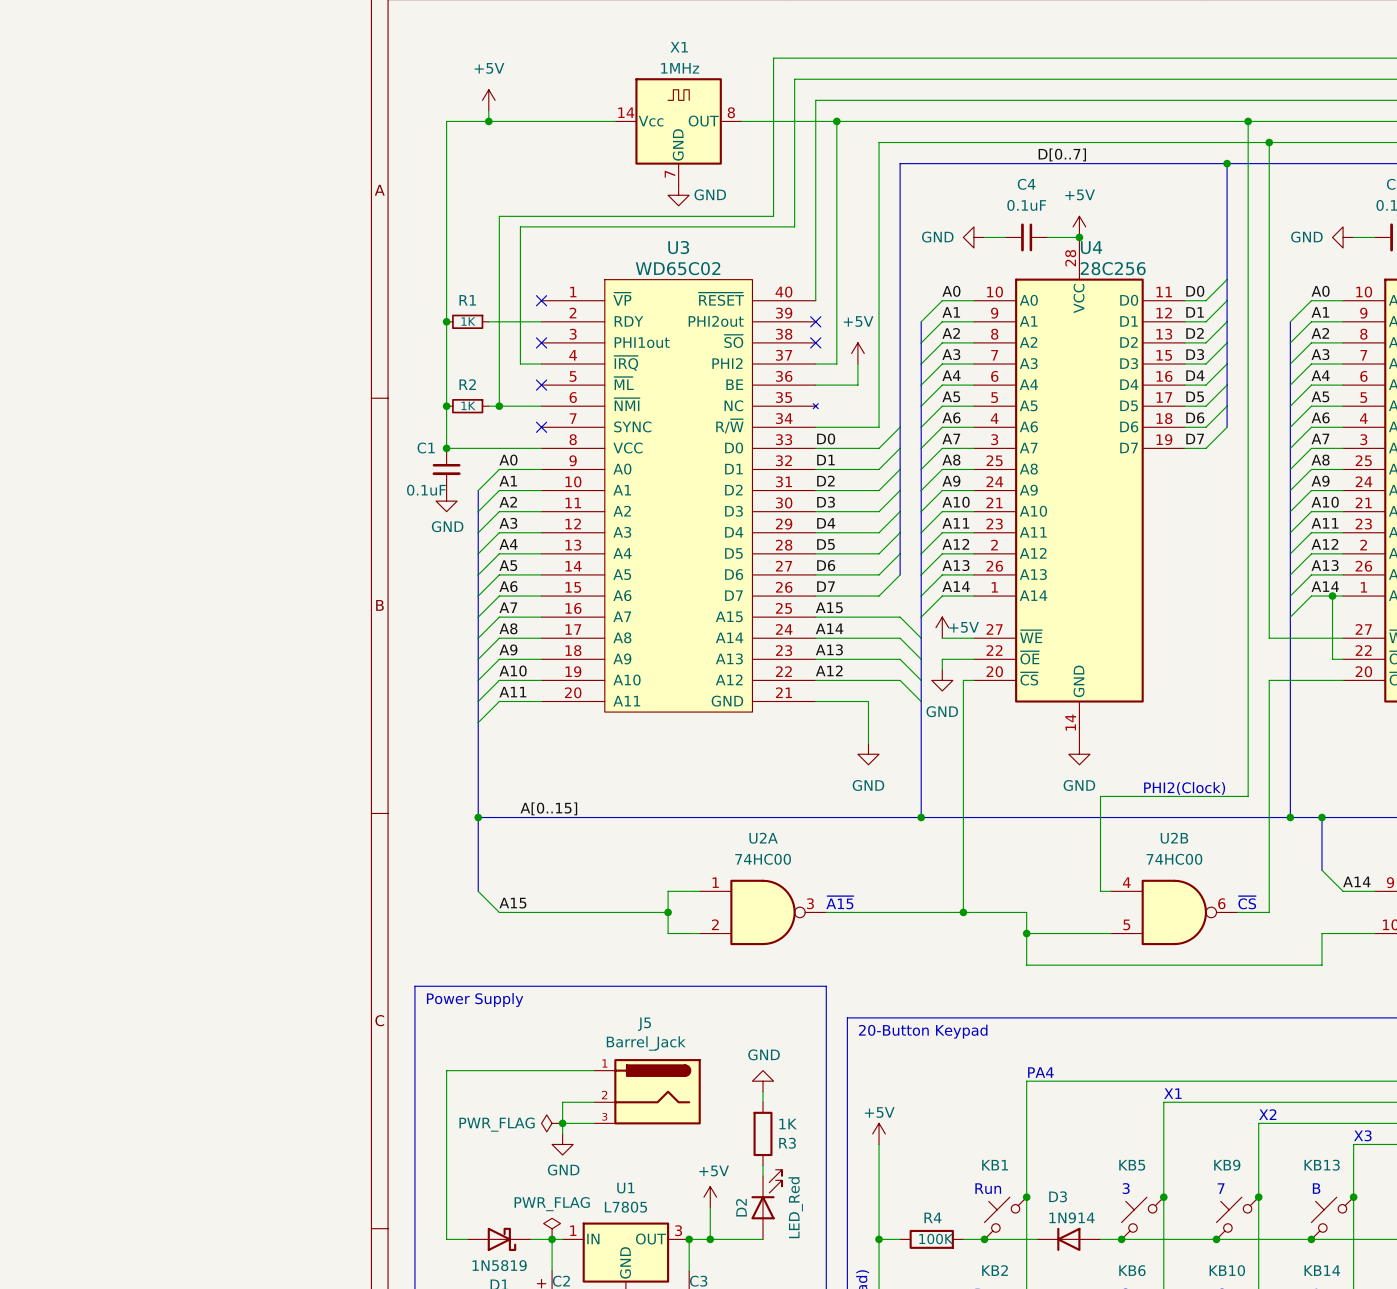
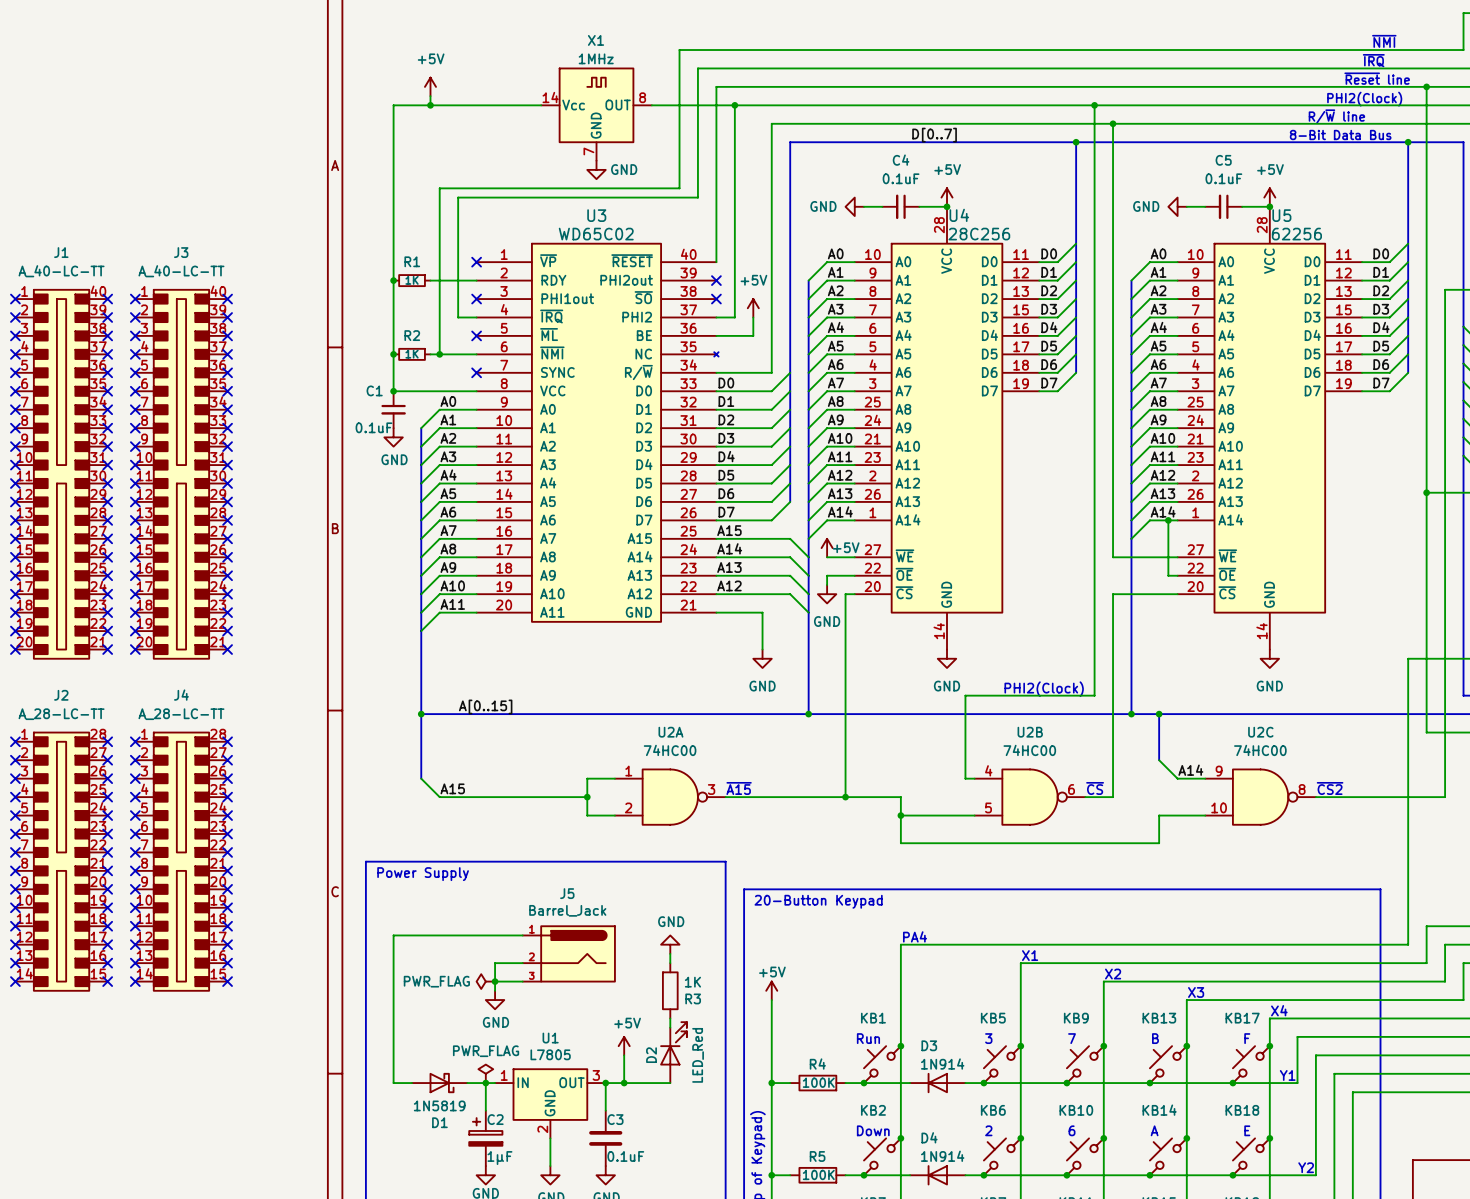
no-connect mark: none -> (15, 299)
no-connect mark: none -> (107, 299)
no-connect mark: none -> (135, 299)
no-connect mark: none -> (227, 299)
no-connect mark: none -> (15, 317)
no-connect mark: none -> (107, 317)
no-connect mark: none -> (135, 317)
no-connect mark: none -> (227, 317)
no-connect mark: none -> (15, 335)
no-connect mark: none -> (107, 335)
no-connect mark: none -> (135, 335)
no-connect mark: none -> (227, 335)
no-connect mark: none -> (15, 354)
no-connect mark: none -> (107, 354)
no-connect mark: none -> (135, 354)
no-connect mark: none -> (227, 354)
no-connect mark: none -> (15, 372)
no-connect mark: none -> (107, 372)
no-connect mark: none -> (135, 372)
no-connect mark: none -> (227, 372)
no-connect mark: none -> (15, 391)
no-connect mark: none -> (107, 391)
no-connect mark: none -> (135, 391)
no-connect mark: none -> (227, 391)
no-connect mark: none -> (15, 409)
no-connect mark: none -> (107, 409)
no-connect mark: none -> (135, 409)
no-connect mark: none -> (227, 409)
no-connect mark: none -> (15, 428)
no-connect mark: none -> (107, 428)
no-connect mark: none -> (135, 428)
no-connect mark: none -> (227, 428)
no-connect mark: none -> (15, 446)
no-connect mark: none -> (107, 446)
no-connect mark: none -> (135, 446)
no-connect mark: none -> (227, 446)
no-connect mark: none -> (15, 465)
no-connect mark: none -> (107, 465)
no-connect mark: none -> (135, 465)
no-connect mark: none -> (227, 465)
J1: none -> A_40-LC-TT (61, 474)
J3: none -> A_40-LC-TT (181, 474)
no-connect mark: none -> (15, 483)
no-connect mark: none -> (107, 483)
no-connect mark: none -> (135, 483)
no-connect mark: none -> (227, 483)
no-connect mark: none -> (15, 501)
no-connect mark: none -> (107, 501)
no-connect mark: none -> (135, 501)
no-connect mark: none -> (227, 501)
no-connect mark: none -> (15, 520)
no-connect mark: none -> (107, 520)
no-connect mark: none -> (135, 520)
no-connect mark: none -> (227, 520)
no-connect mark: none -> (15, 538)
no-connect mark: none -> (107, 538)
no-connect mark: none -> (135, 538)
no-connect mark: none -> (227, 538)
no-connect mark: none -> (15, 557)
no-connect mark: none -> (107, 557)
no-connect mark: none -> (135, 557)
no-connect mark: none -> (227, 557)
no-connect mark: none -> (15, 575)
no-connect mark: none -> (107, 575)
no-connect mark: none -> (135, 575)
no-connect mark: none -> (227, 575)
no-connect mark: none -> (15, 594)
no-connect mark: none -> (107, 594)
no-connect mark: none -> (135, 594)
no-connect mark: none -> (227, 594)
no-connect mark: none -> (15, 612)
no-connect mark: none -> (107, 612)
no-connect mark: none -> (135, 612)
no-connect mark: none -> (227, 612)
no-connect mark: none -> (15, 631)
no-connect mark: none -> (107, 631)
no-connect mark: none -> (135, 631)
no-connect mark: none -> (227, 631)
no-connect mark: none -> (15, 649)
no-connect mark: none -> (107, 649)
no-connect mark: none -> (135, 649)
no-connect mark: none -> (227, 649)
no-connect mark: none -> (15, 741)
no-connect mark: none -> (107, 741)
no-connect mark: none -> (135, 741)
no-connect mark: none -> (227, 741)
no-connect mark: none -> (15, 760)
no-connect mark: none -> (107, 760)
no-connect mark: none -> (135, 760)
no-connect mark: none -> (227, 760)
no-connect mark: none -> (15, 778)
no-connect mark: none -> (107, 778)
no-connect mark: none -> (135, 778)
no-connect mark: none -> (227, 778)
no-connect mark: none -> (15, 797)
no-connect mark: none -> (107, 797)
no-connect mark: none -> (135, 797)
no-connect mark: none -> (227, 797)
no-connect mark: none -> (15, 815)
no-connect mark: none -> (107, 815)
no-connect mark: none -> (135, 815)
no-connect mark: none -> (227, 815)
no-connect mark: none -> (15, 834)
no-connect mark: none -> (107, 834)
no-connect mark: none -> (135, 834)
no-connect mark: none -> (227, 834)
no-connect mark: none -> (15, 852)
no-connect mark: none -> (107, 852)
no-connect mark: none -> (135, 852)
no-connect mark: none -> (227, 852)
J2: none -> A_28-LC-TT (61, 861)
J4: none -> A_28-LC-TT (181, 861)
no-connect mark: none -> (15, 870)
no-connect mark: none -> (107, 870)
no-connect mark: none -> (135, 870)
no-connect mark: none -> (227, 870)
no-connect mark: none -> (15, 889)
no-connect mark: none -> (107, 889)
no-connect mark: none -> (135, 889)
no-connect mark: none -> (227, 889)
no-connect mark: none -> (15, 907)
no-connect mark: none -> (107, 907)
no-connect mark: none -> (135, 907)
no-connect mark: none -> (227, 907)
no-connect mark: none -> (15, 926)
no-connect mark: none -> (107, 926)
no-connect mark: none -> (135, 926)
no-connect mark: none -> (227, 926)
no-connect mark: none -> (15, 944)
no-connect mark: none -> (107, 944)
no-connect mark: none -> (135, 944)
no-connect mark: none -> (227, 944)
no-connect mark: none -> (15, 963)
no-connect mark: none -> (107, 963)
no-connect mark: none -> (135, 963)
no-connect mark: none -> (227, 963)
no-connect mark: none -> (15, 981)
no-connect mark: none -> (107, 981)
no-connect mark: none -> (135, 981)
no-connect mark: none -> (227, 981)

